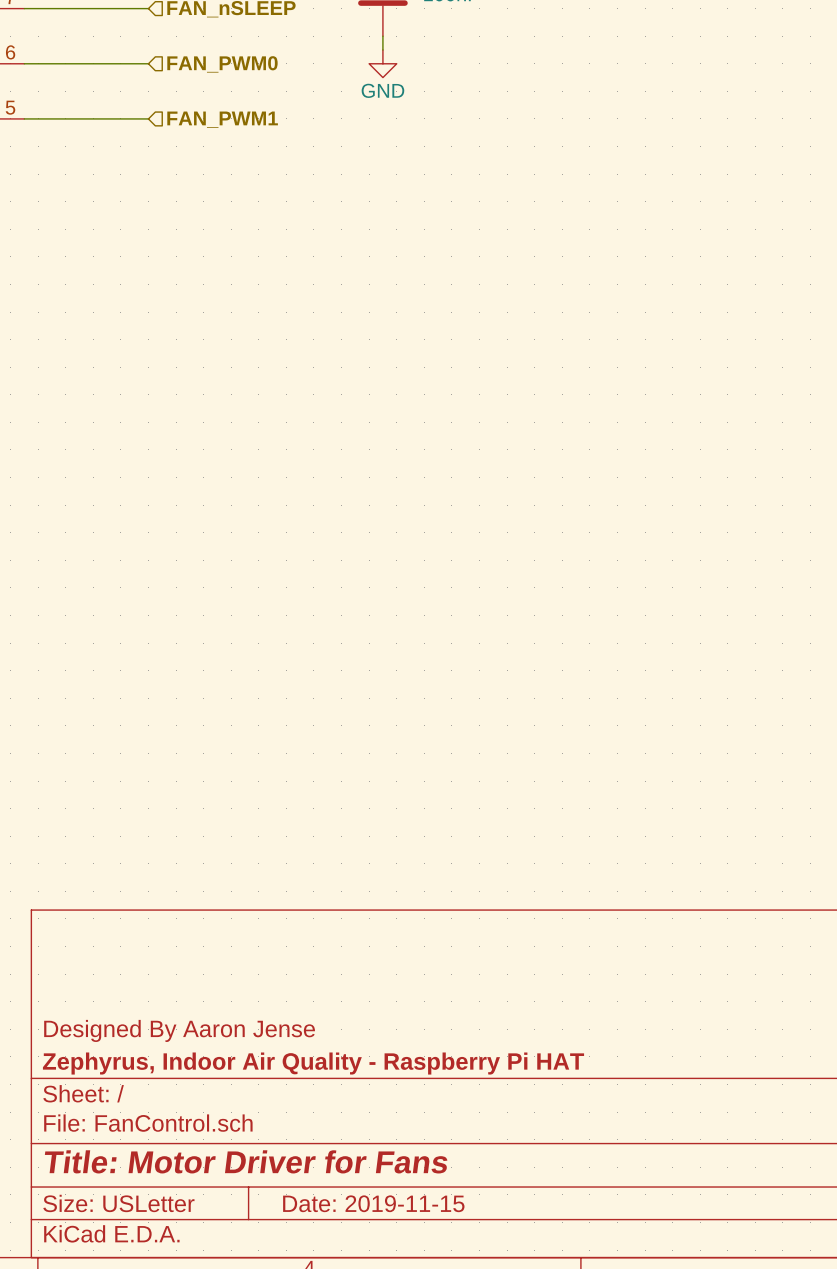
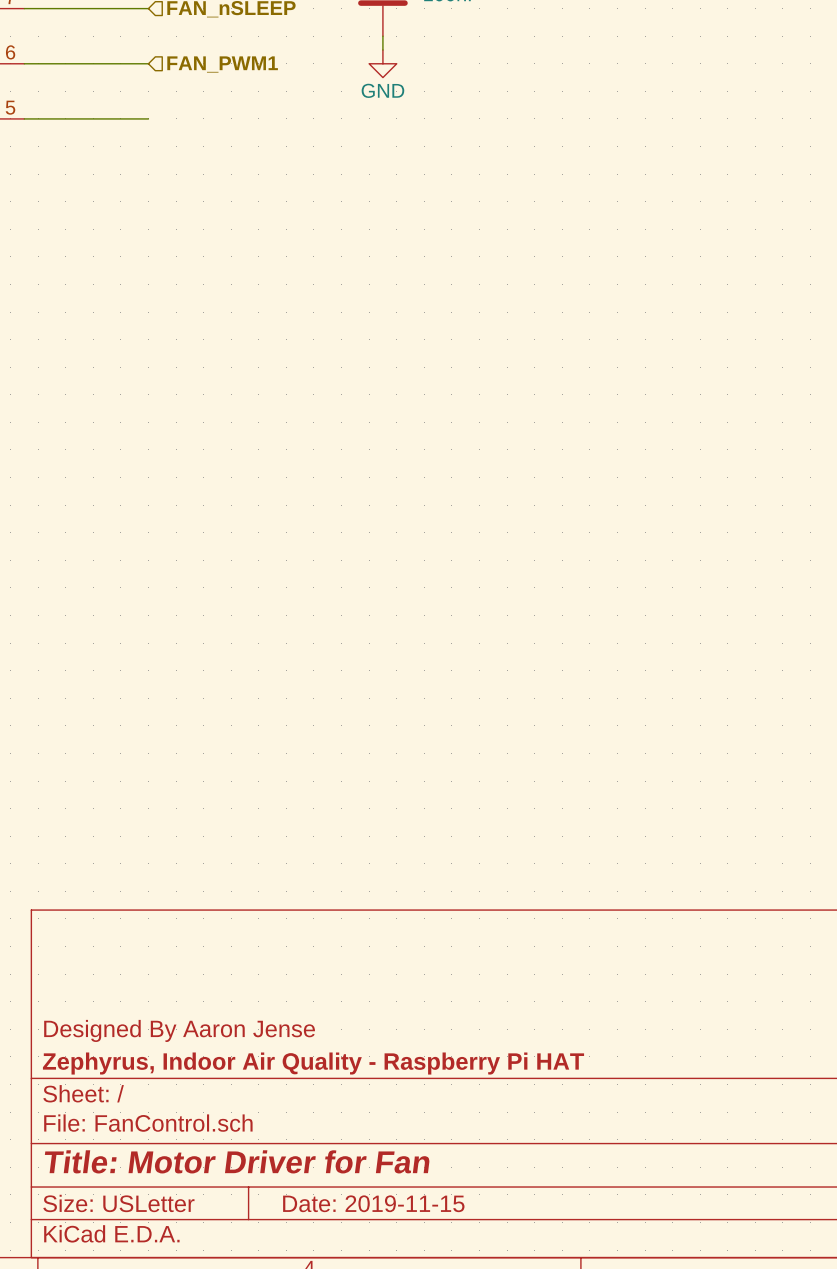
hierarchical label: FAN_PWM0 (222, 64) -> FAN_PWM1 (222, 64)
hierarchical label: FAN_PWM1 (222, 119) -> none
title block: Title: Motor Driver for Fans (246, 1161) -> Title: Motor Driver for Fan (237, 1161)

